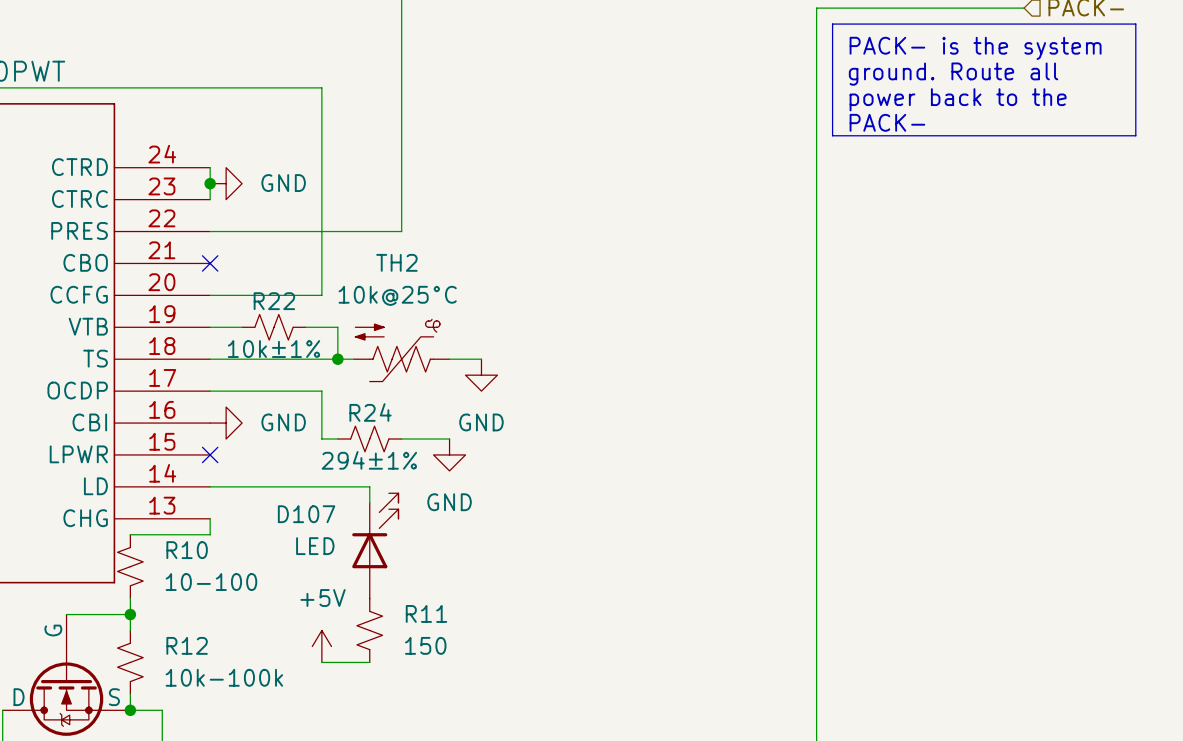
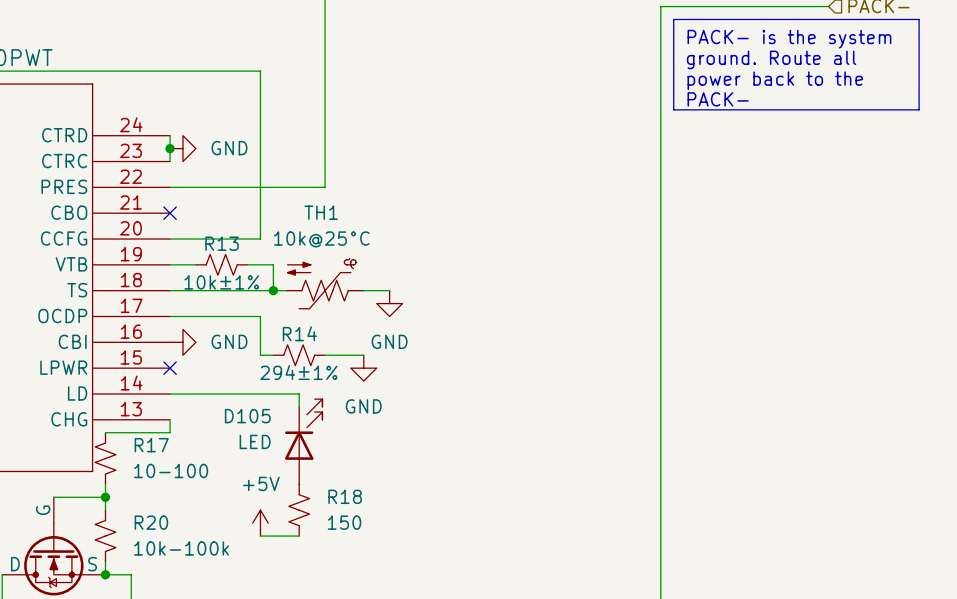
TH2 name: TH2 (396, 262) -> TH1 (321, 212)
R22 name: R22 (274, 301) -> R13 (222, 243)
R24 name: R24 (370, 412) -> R14 (299, 333)
D107 name: D107 (306, 514) -> D105 (247, 416)
R10 name: R10 (187, 550) -> R17 (151, 445)
R11 name: R11 (426, 613) -> R18 (345, 496)
R12 name: R12 (187, 645) -> R20 (151, 522)

